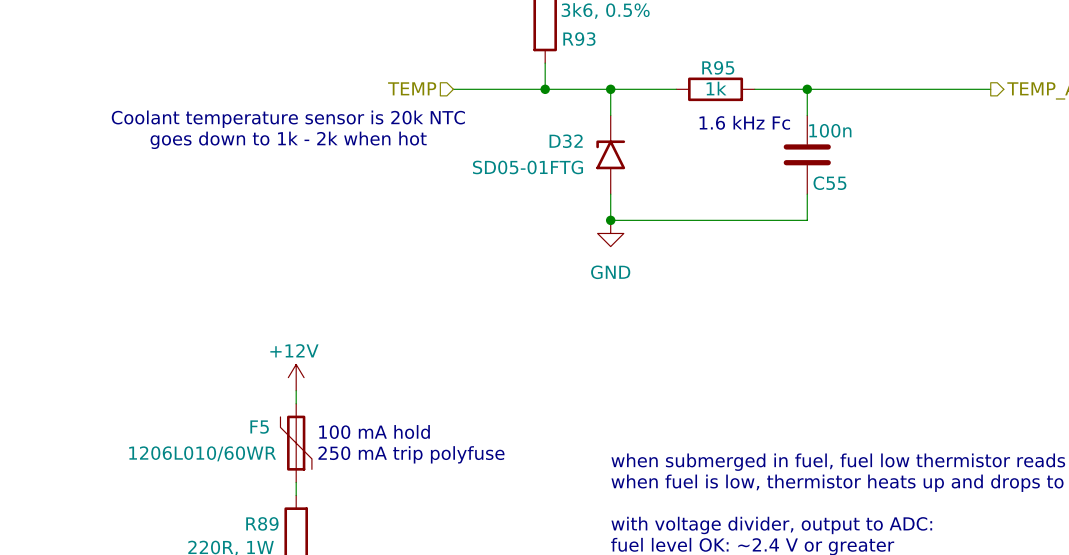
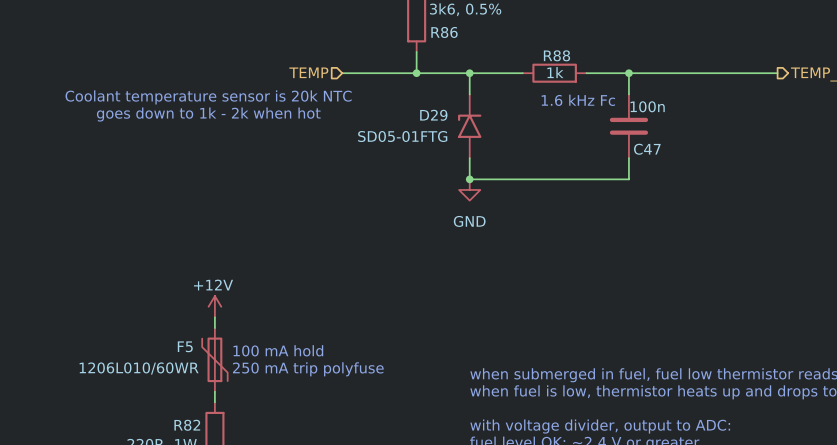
R93 name: R93 (579, 39) -> R86 (444, 32)
R95 name: R95 (718, 67) -> R88 (556, 55)
D32 name: D32 (566, 141) -> D29 (433, 115)
C55 name: C55 (829, 183) -> C47 (647, 149)
R89 name: R89 (262, 523) -> R82 (187, 425)

